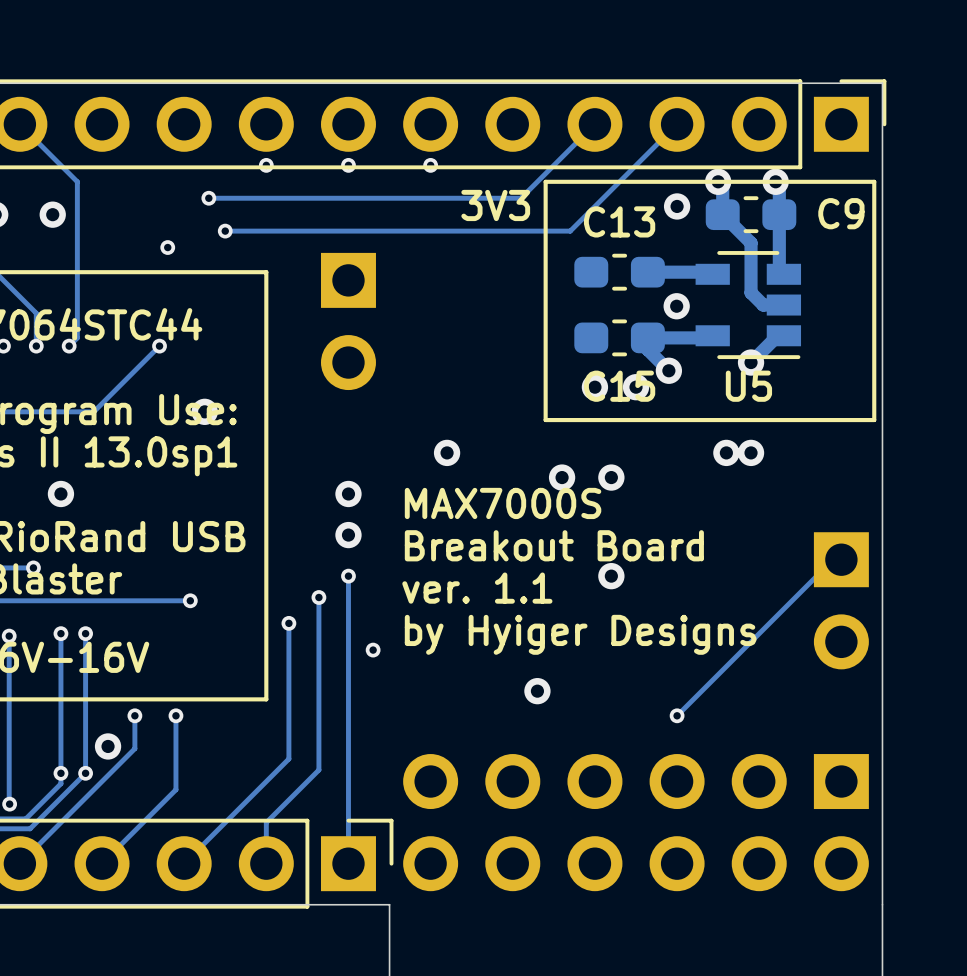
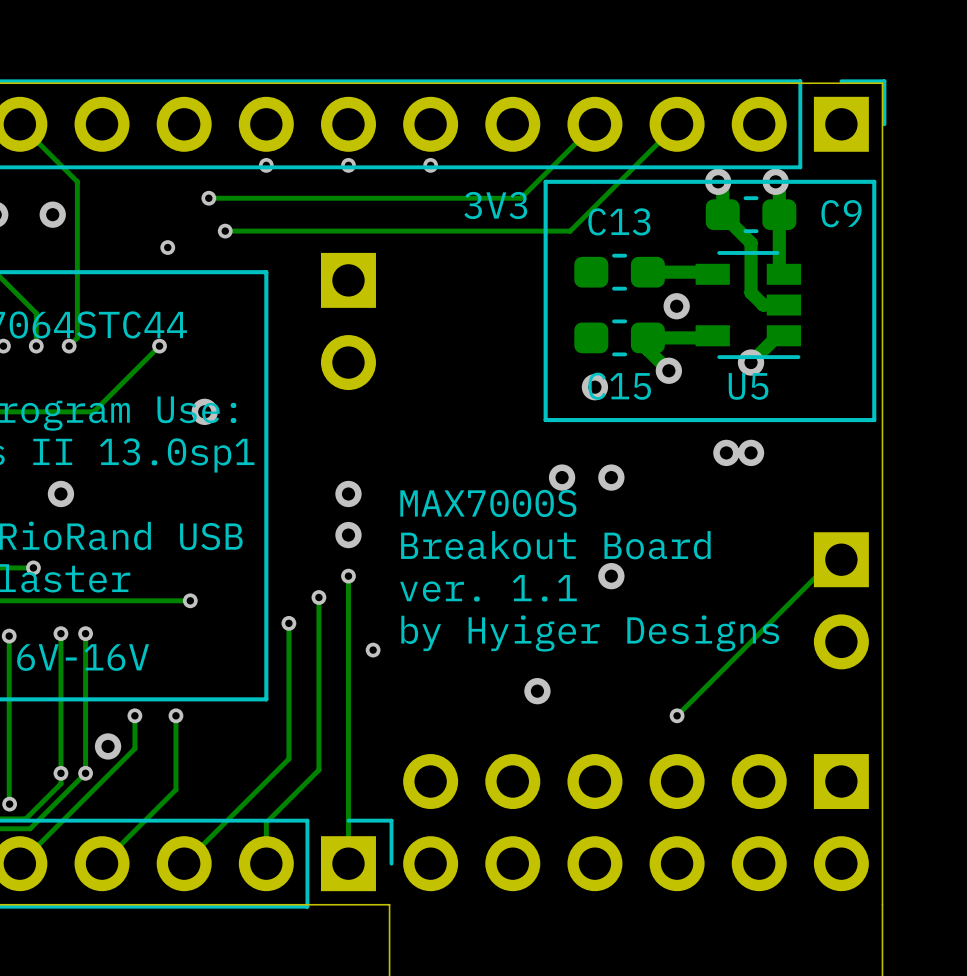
via: (677, 206) -> none
via: (636, 387) -> none
via: (447, 452) -> none

